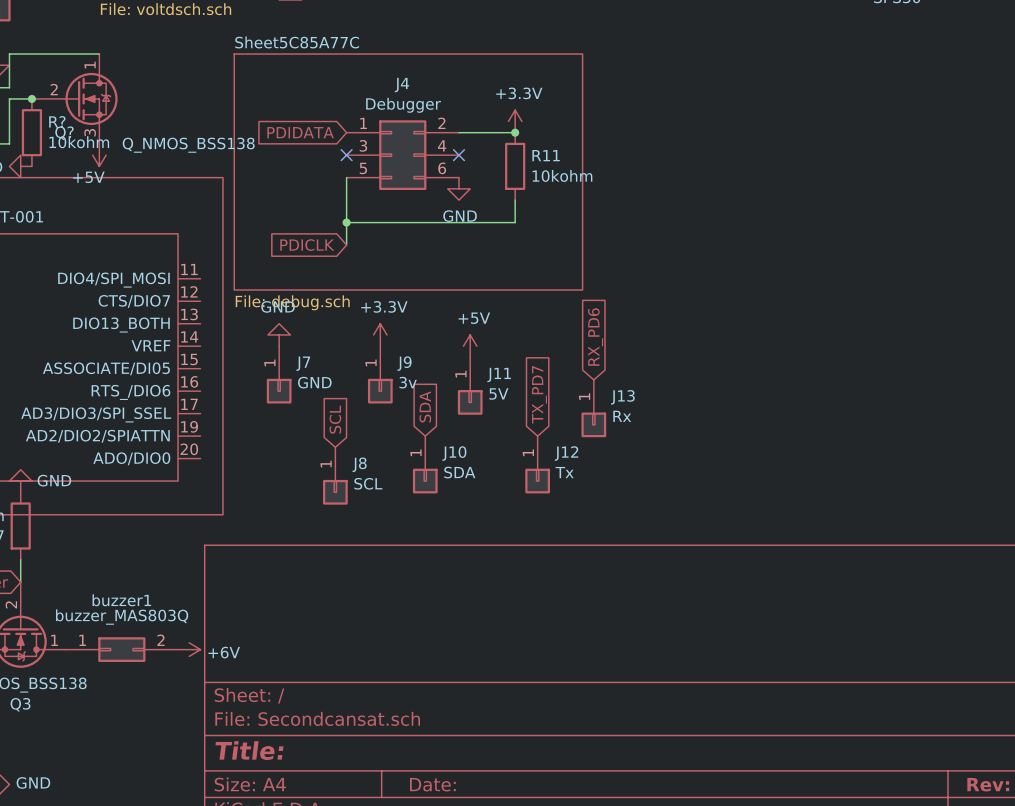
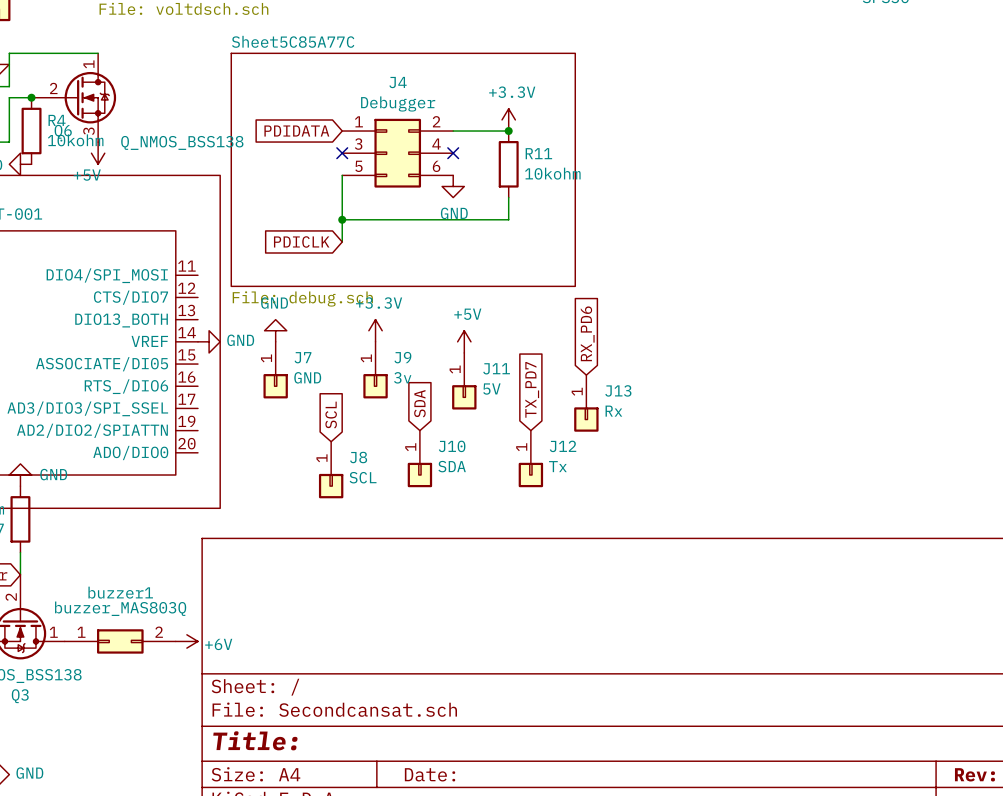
R? name: R? (57, 121) -> R4 (57, 120)
Q? name: Q? (64, 133) -> Q6 (63, 131)
power symbol: none -> GND (209, 341)

